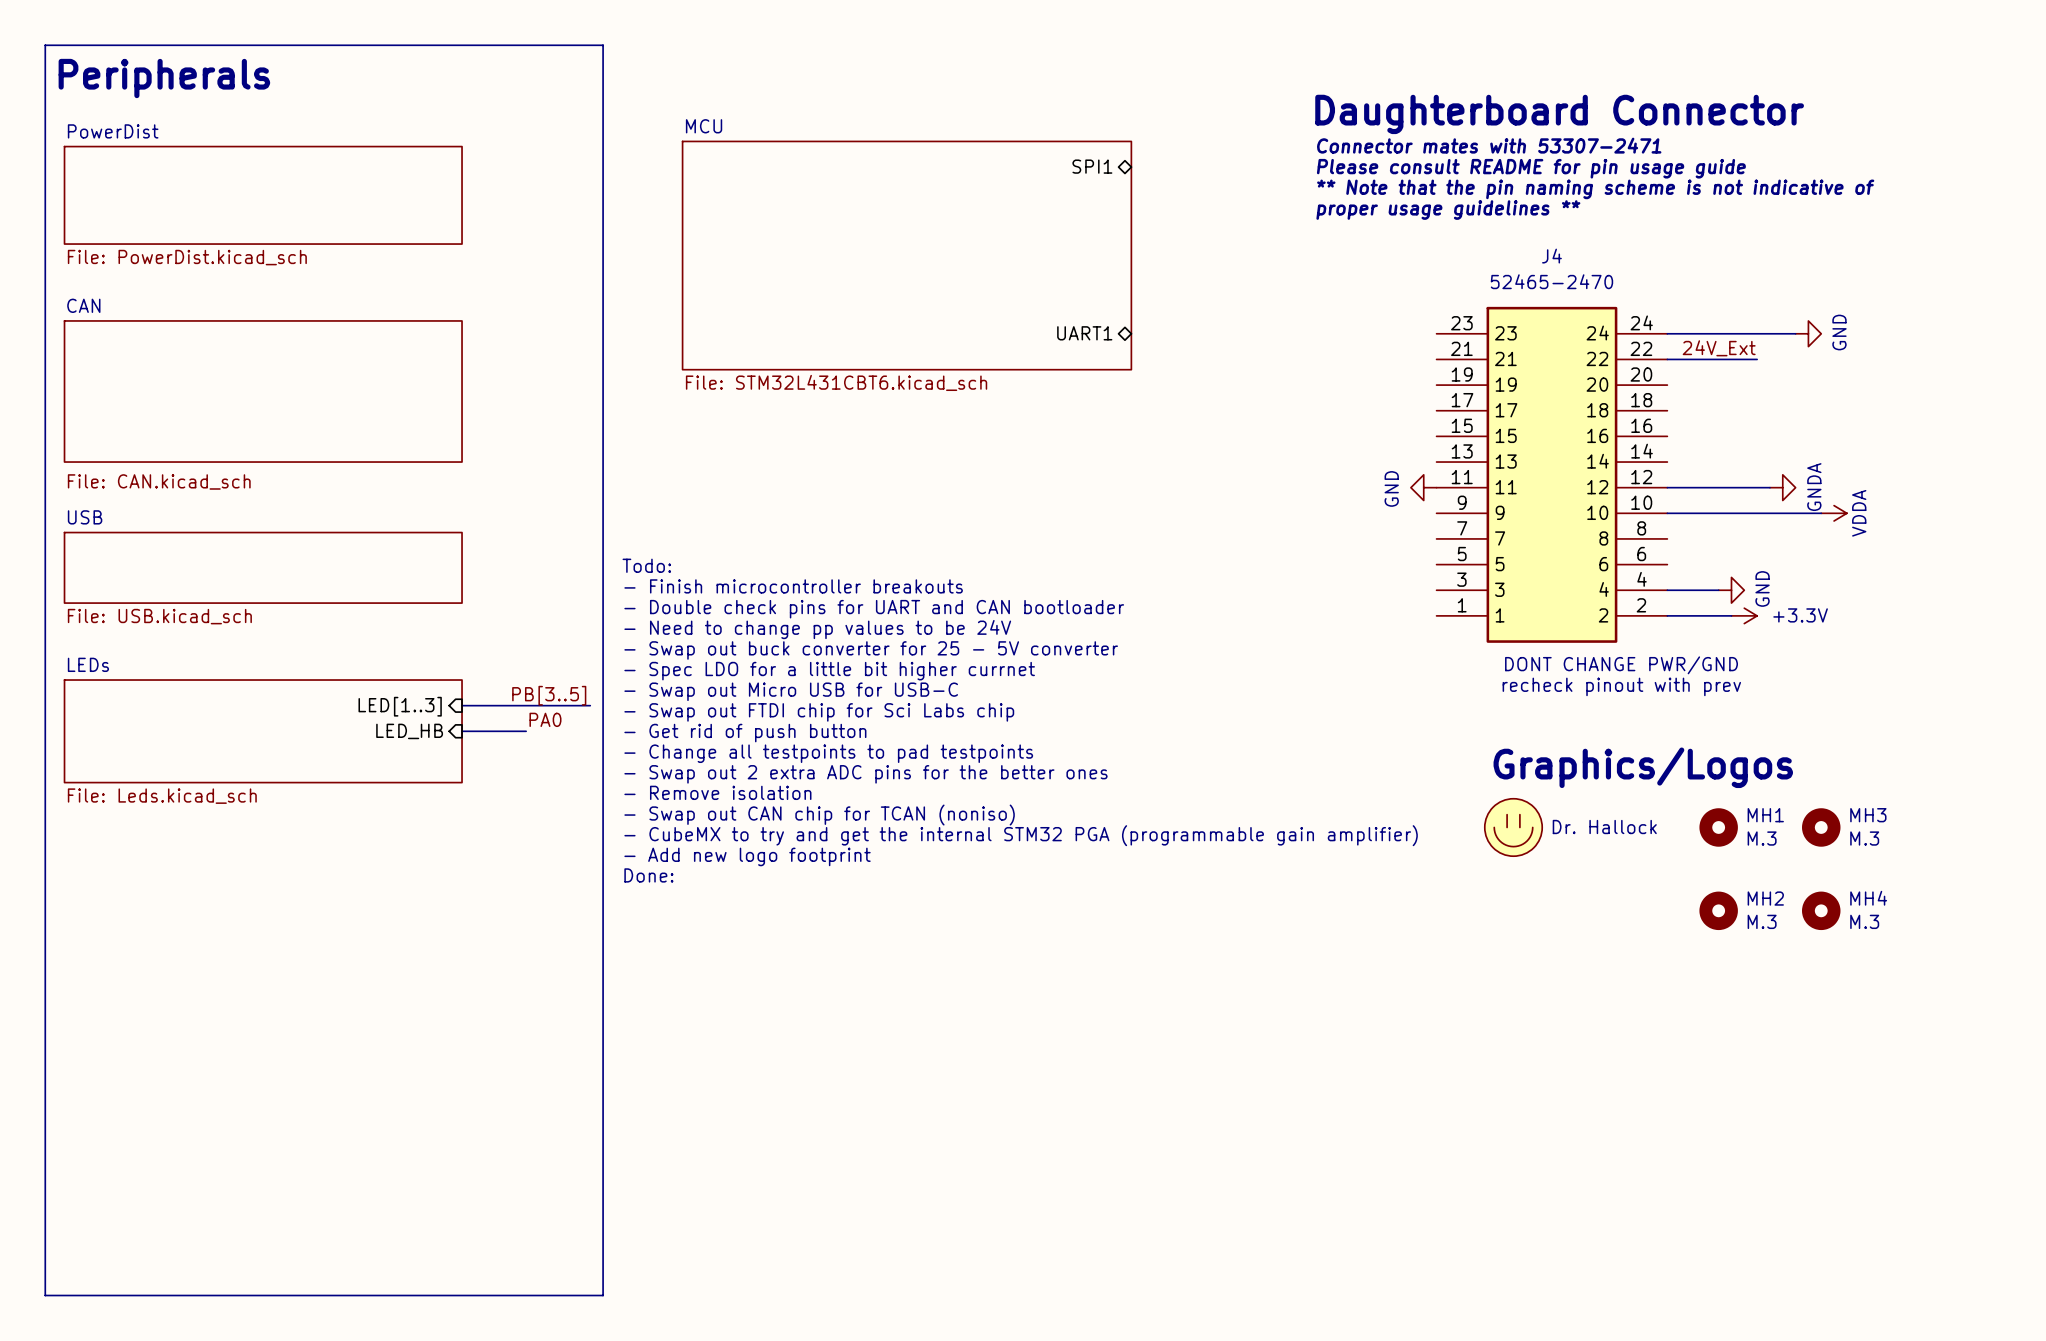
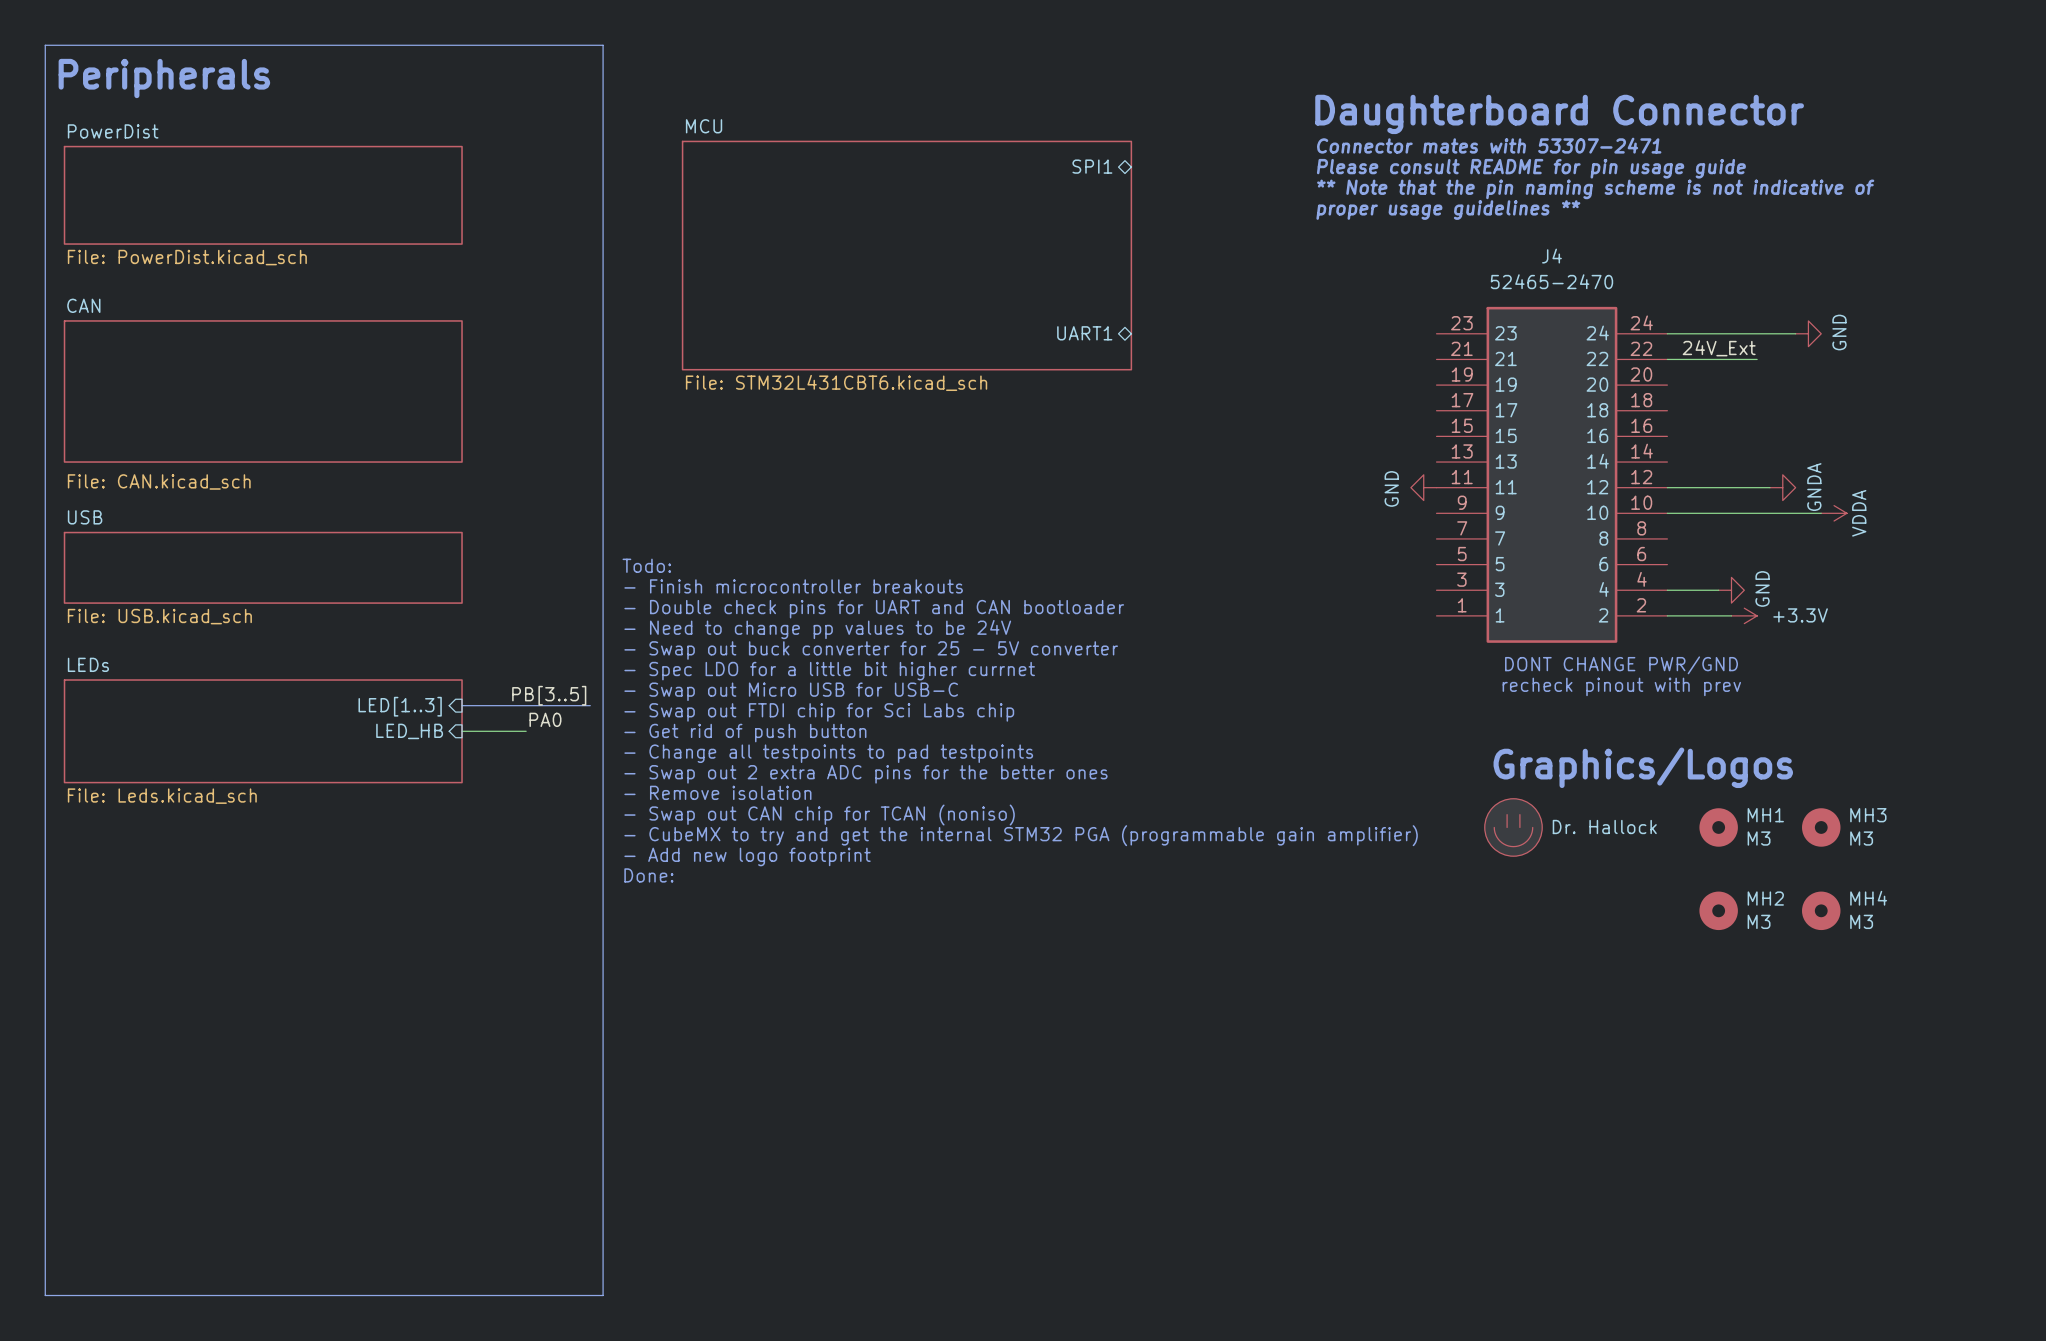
MH1 value: M.3 (1762, 838) -> M3 (1759, 838)
MH3 value: M.3 (1864, 838) -> M3 (1861, 838)
MH2 value: M.3 (1762, 921) -> M3 (1759, 921)
MH4 value: M.3 (1864, 921) -> M3 (1861, 921)

